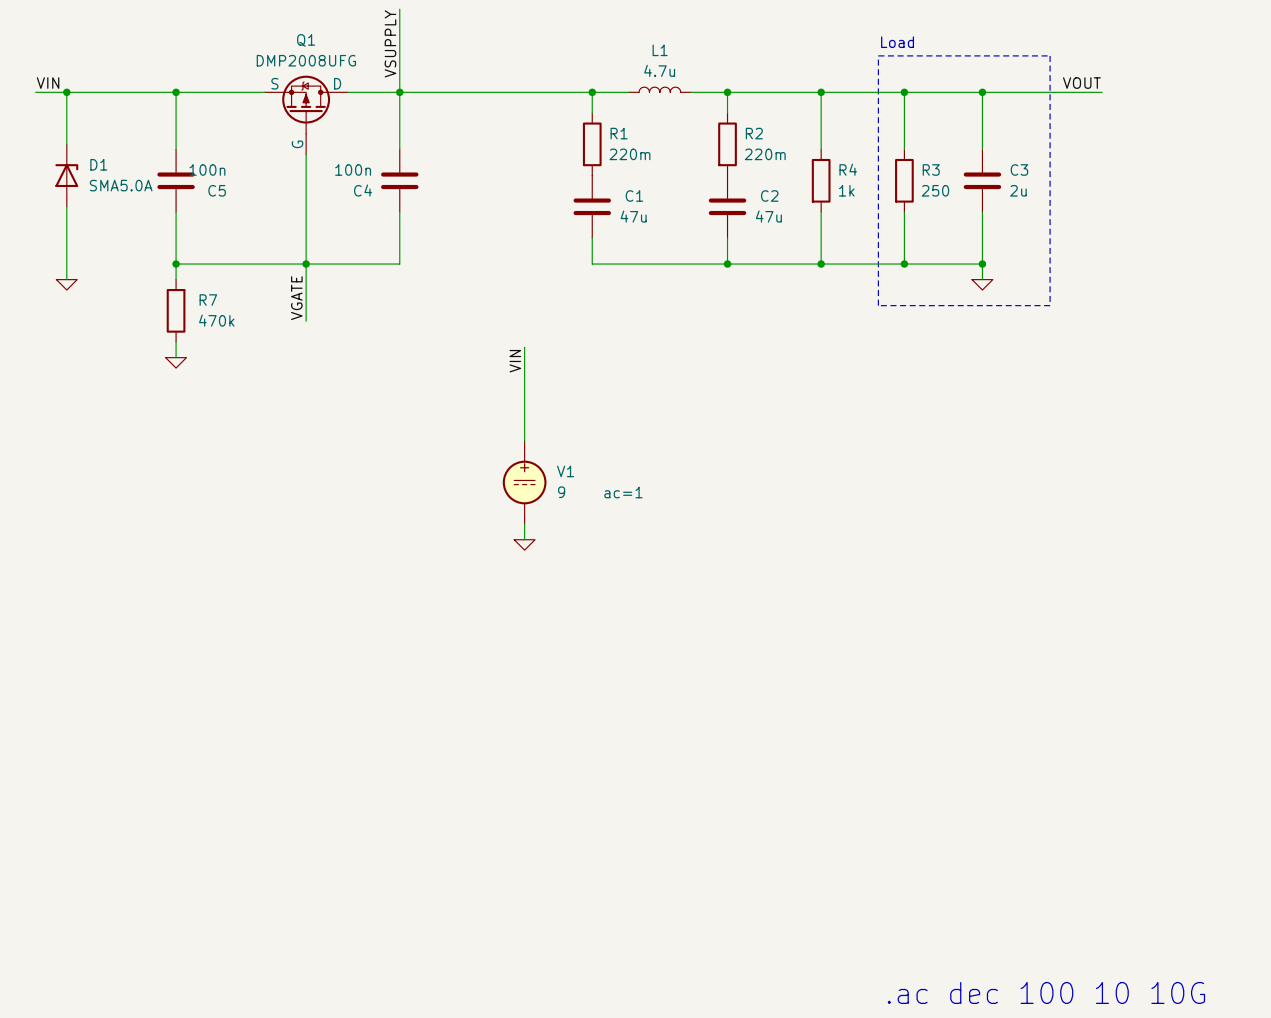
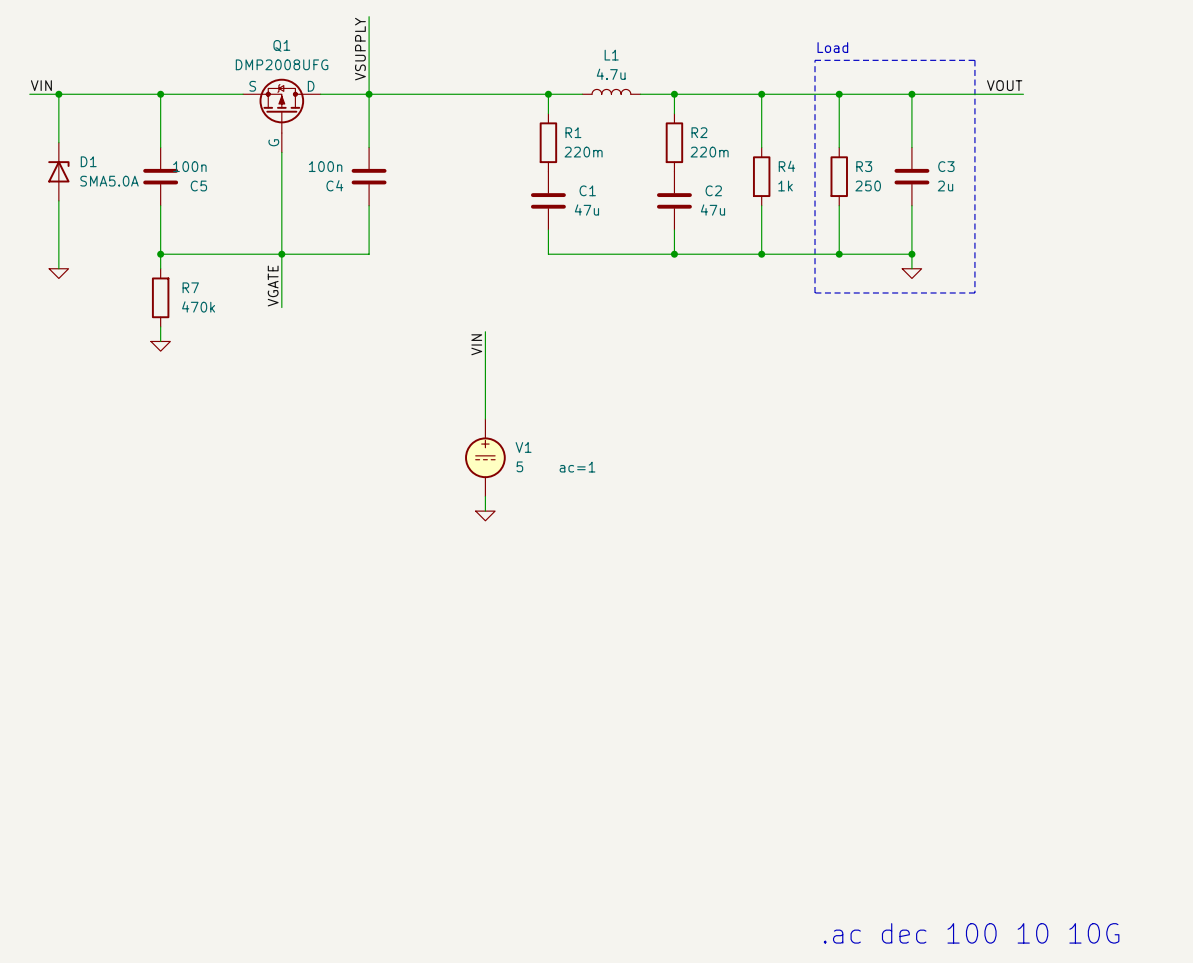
V1 value: 9 (561, 492) -> 5 (519, 466)

